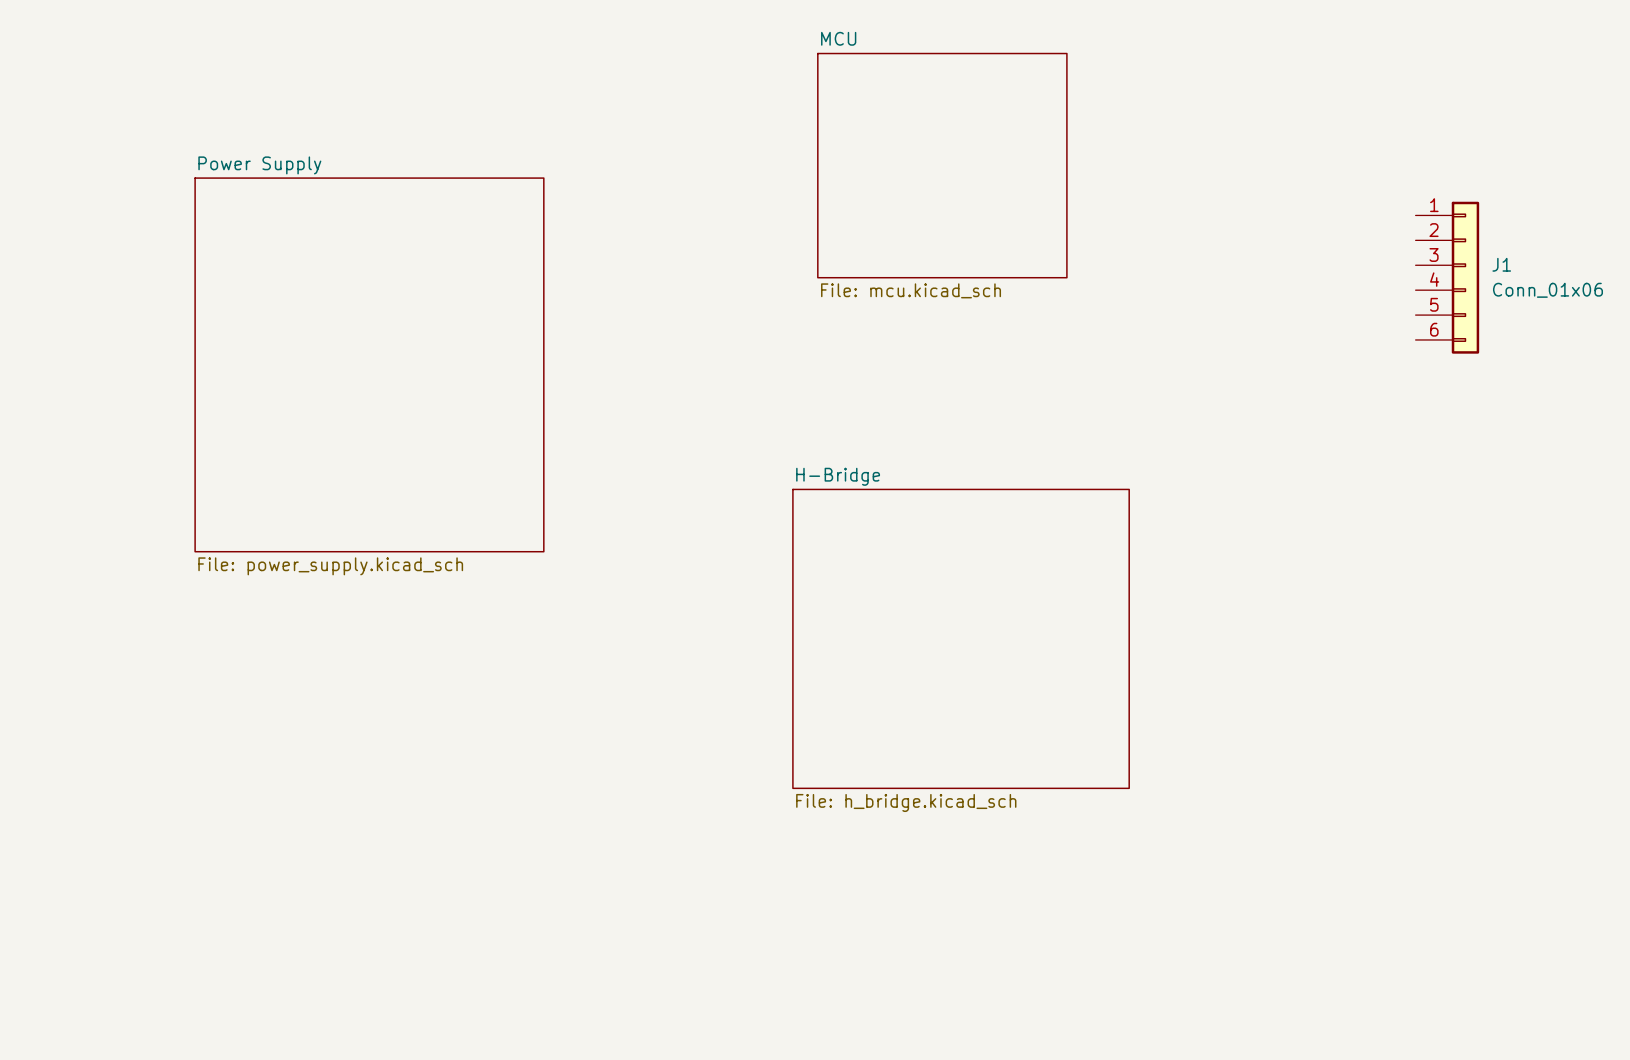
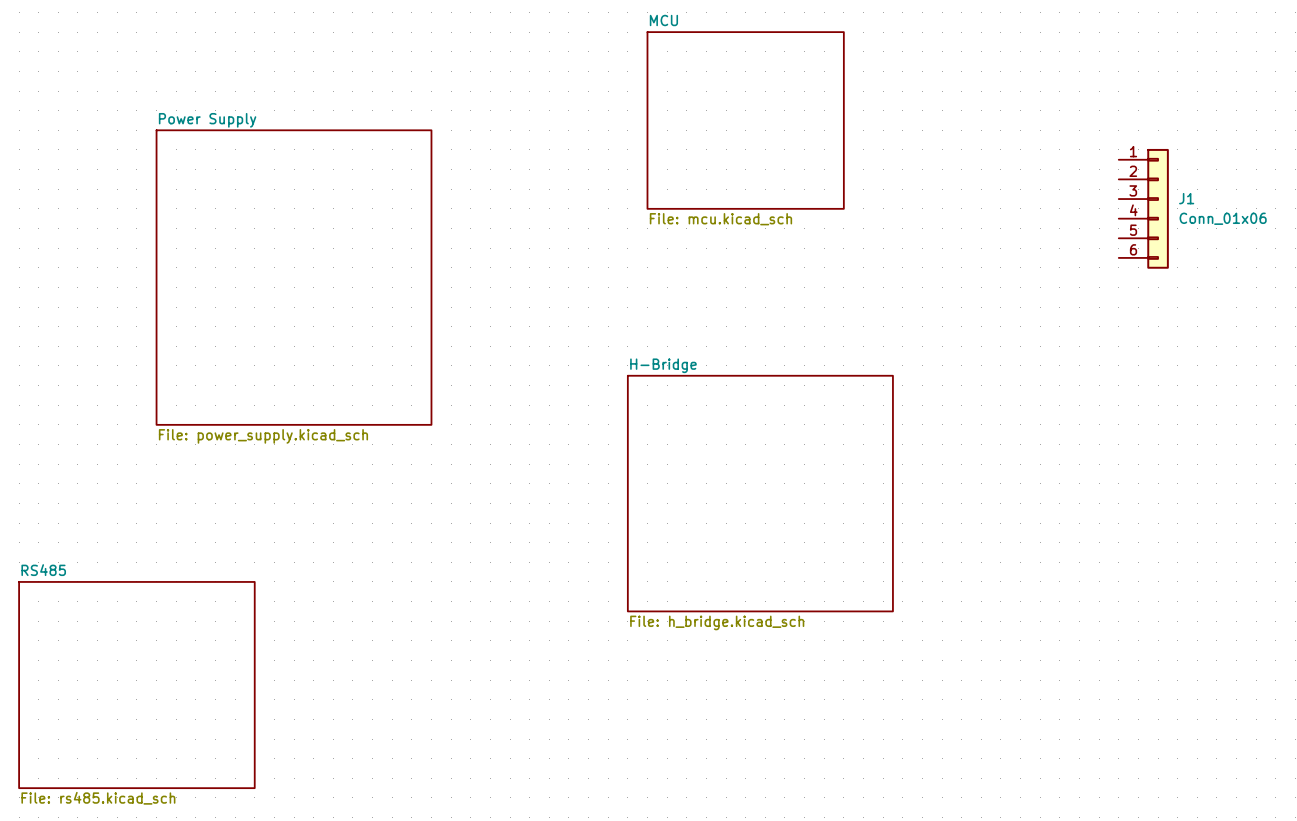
sheet RS485: none -> File: rs485.kicad_sch (136, 685)

